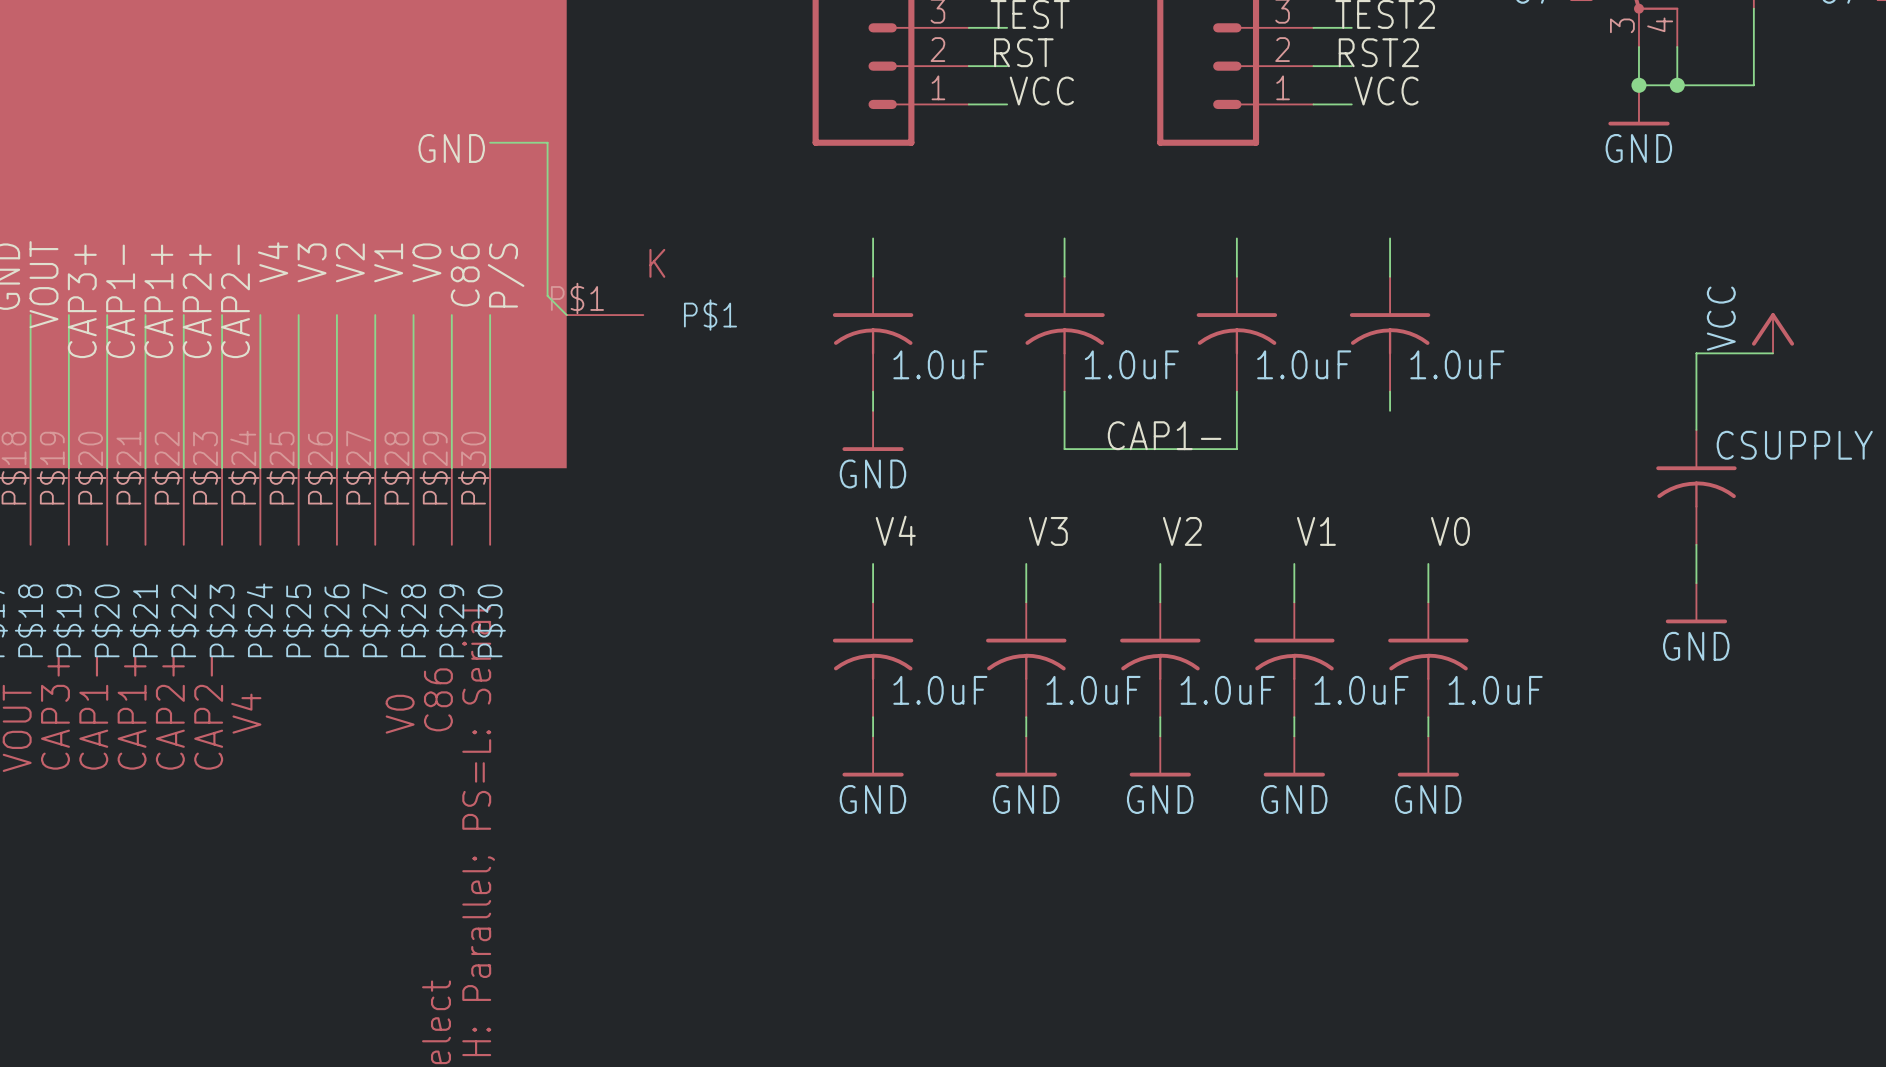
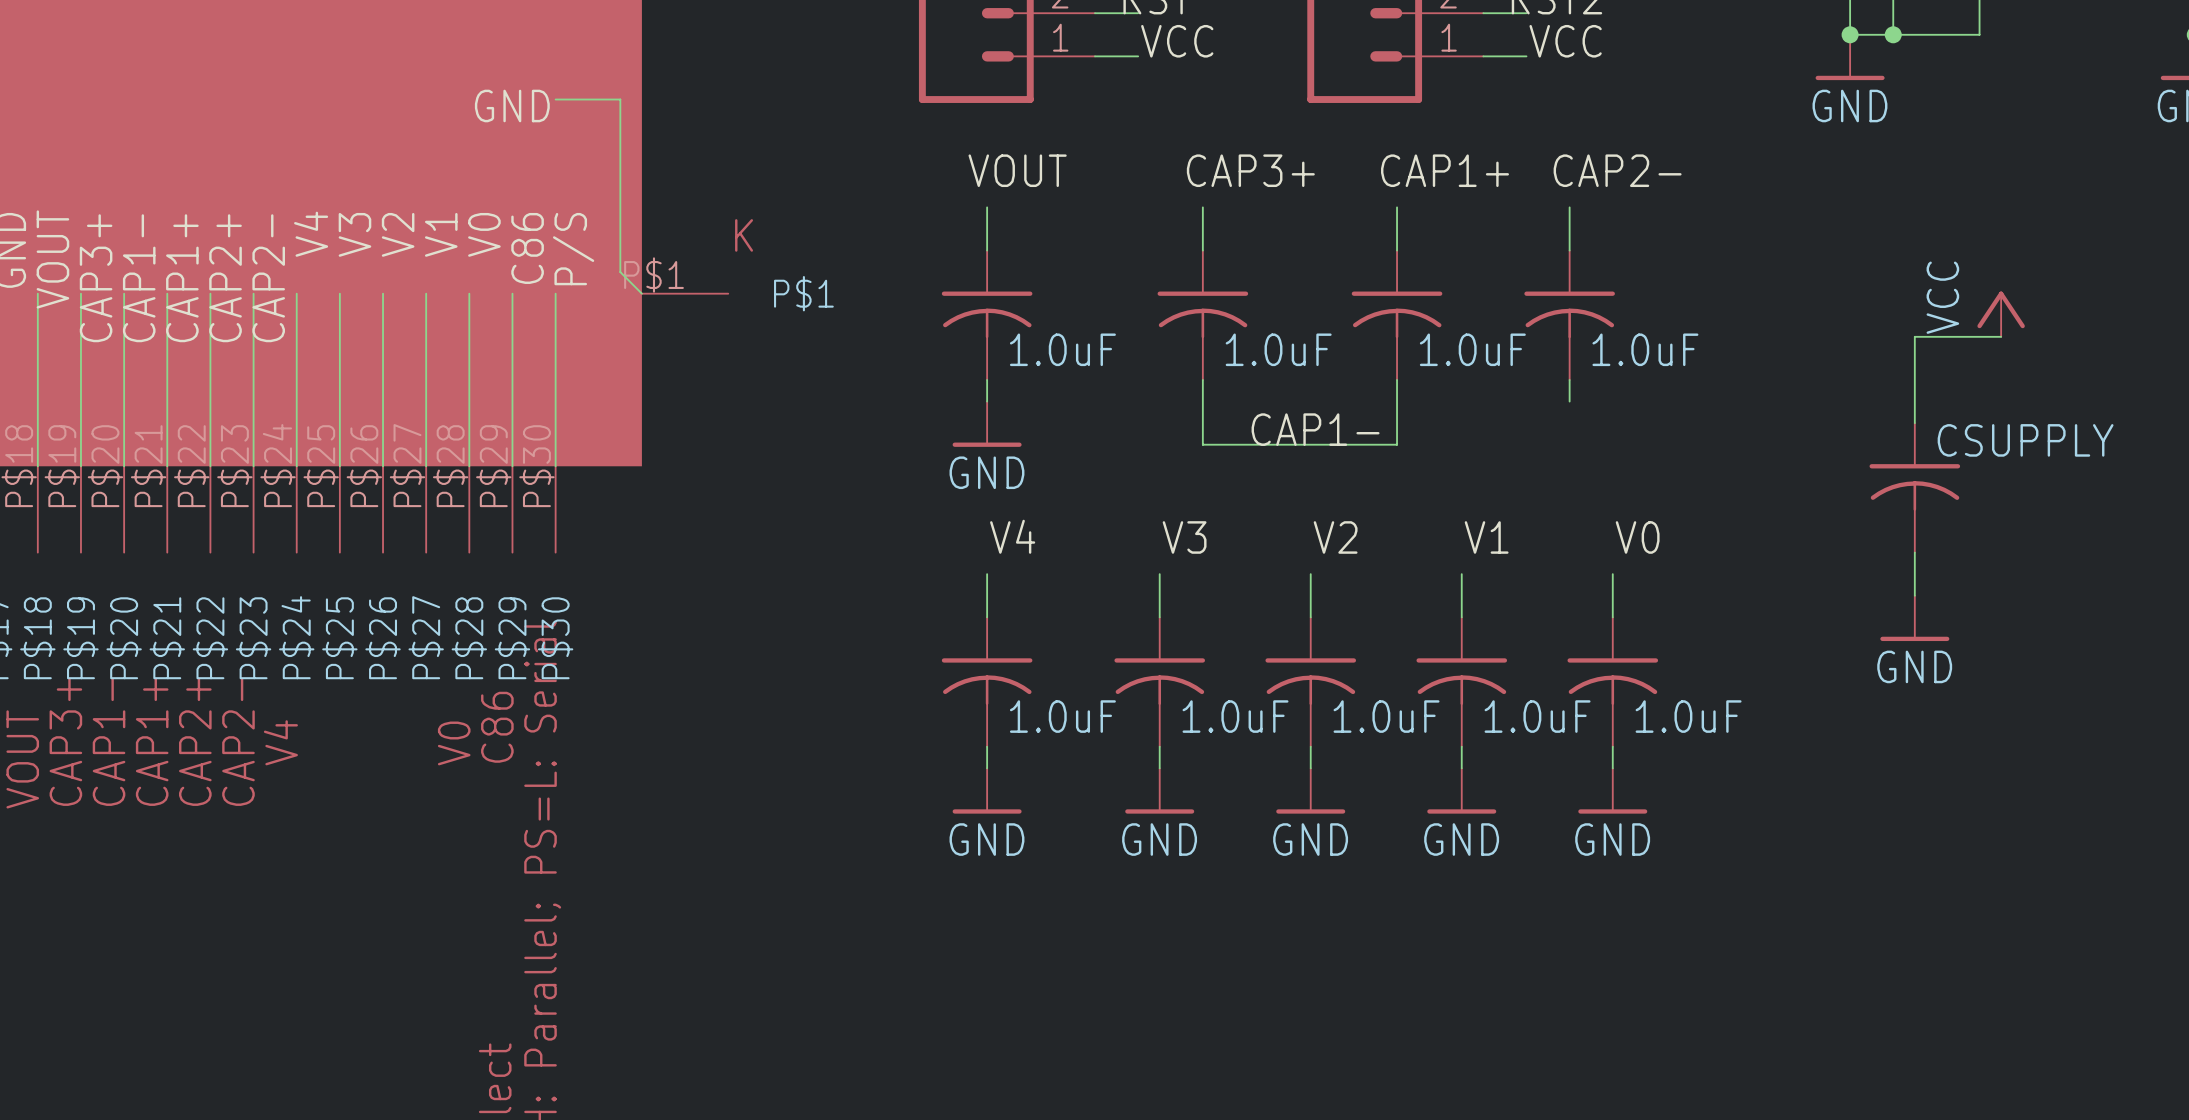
label: none -> VOUT (1017, 170)
label: none -> CAP3+ (1250, 170)
label: none -> CAP1+ (1445, 170)
label: none -> CAP2- (1617, 170)

